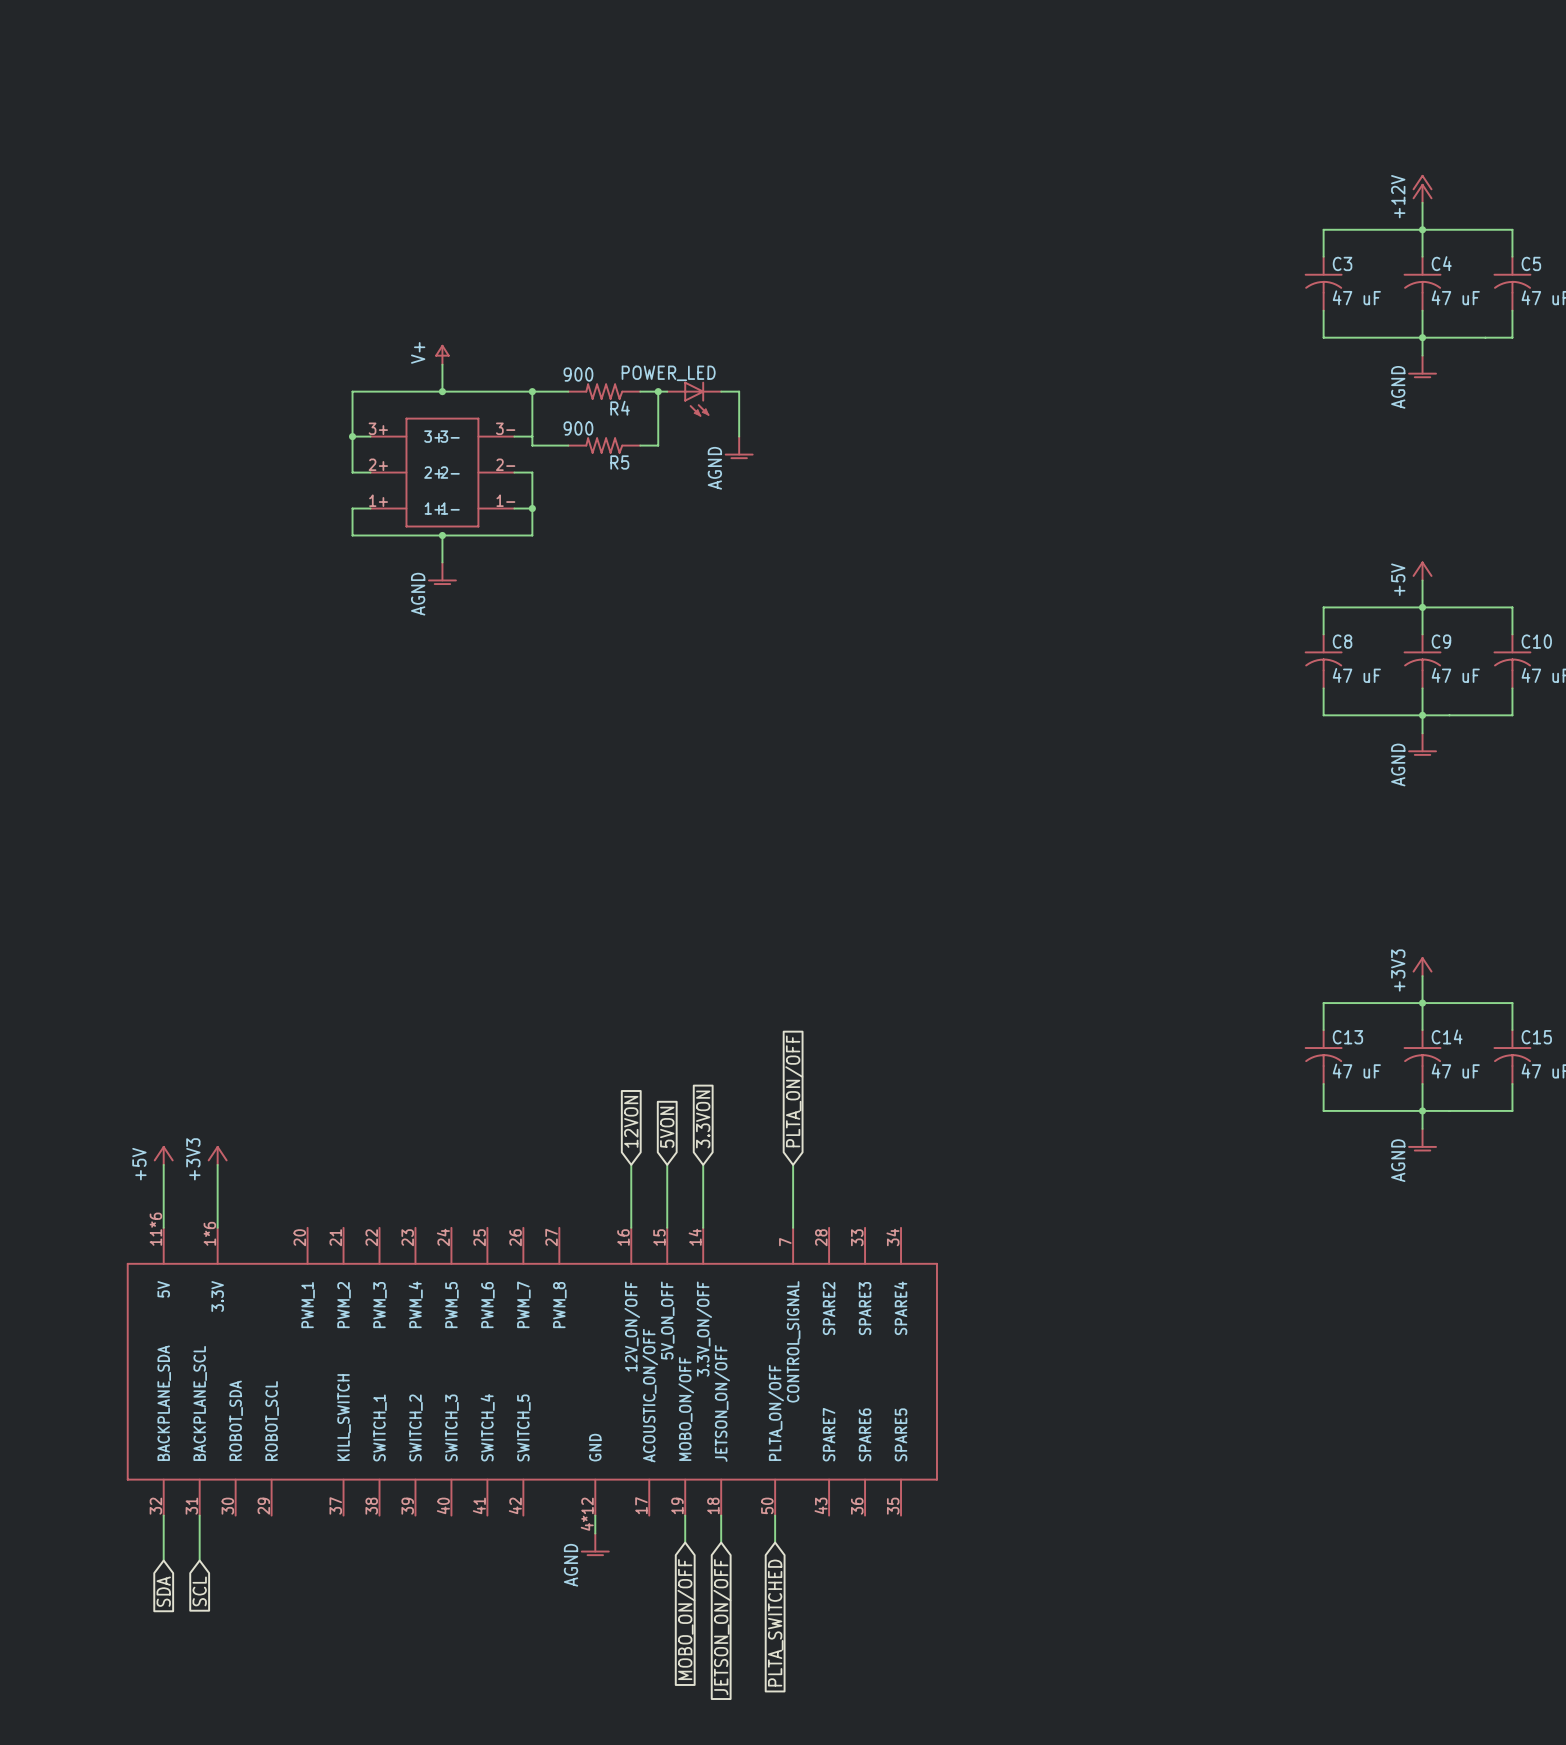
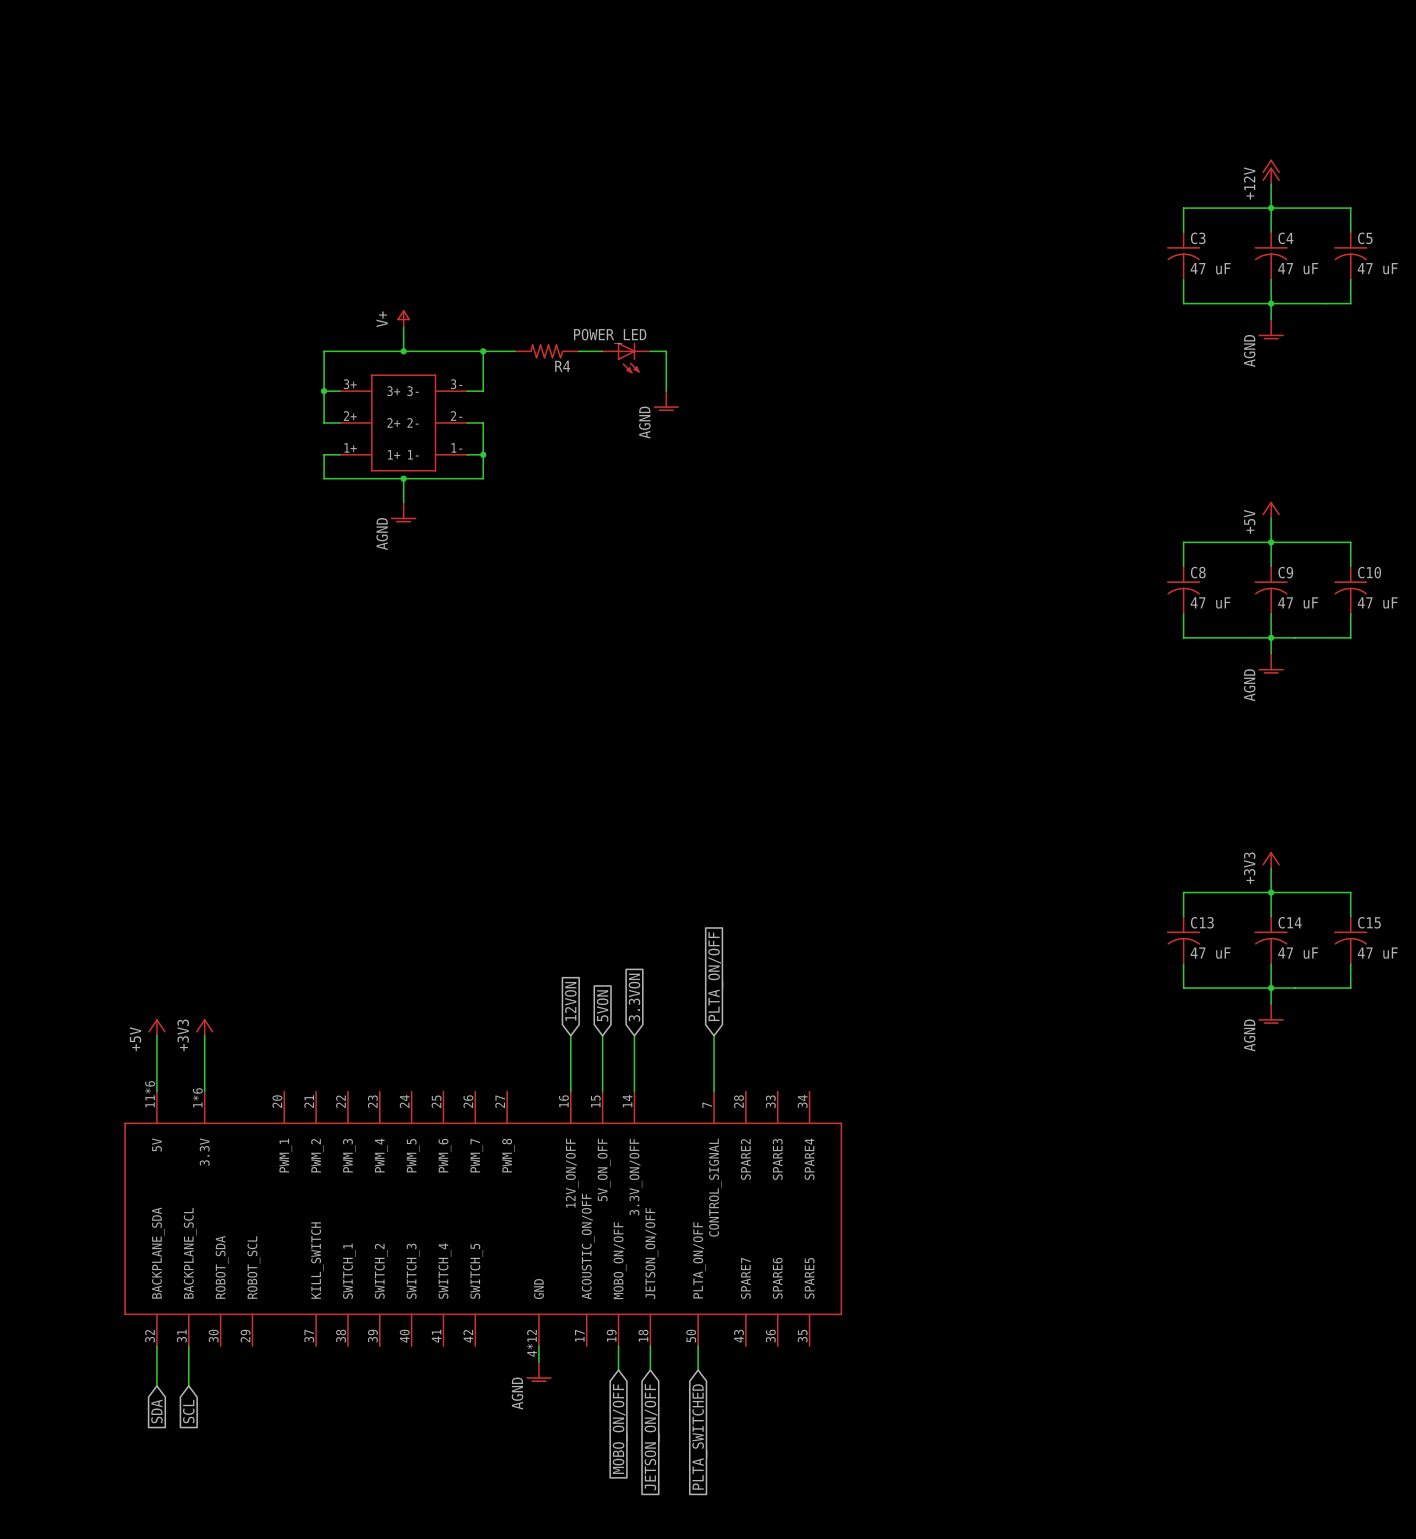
R4 value: 900 (578, 374) -> none
wire: (658, 391) (658, 445) (640, 445) -> none
junction: (658, 391) -> none
wire: (532, 436) (532, 445) (568, 445) -> none
R5: 900 (604, 445) -> none

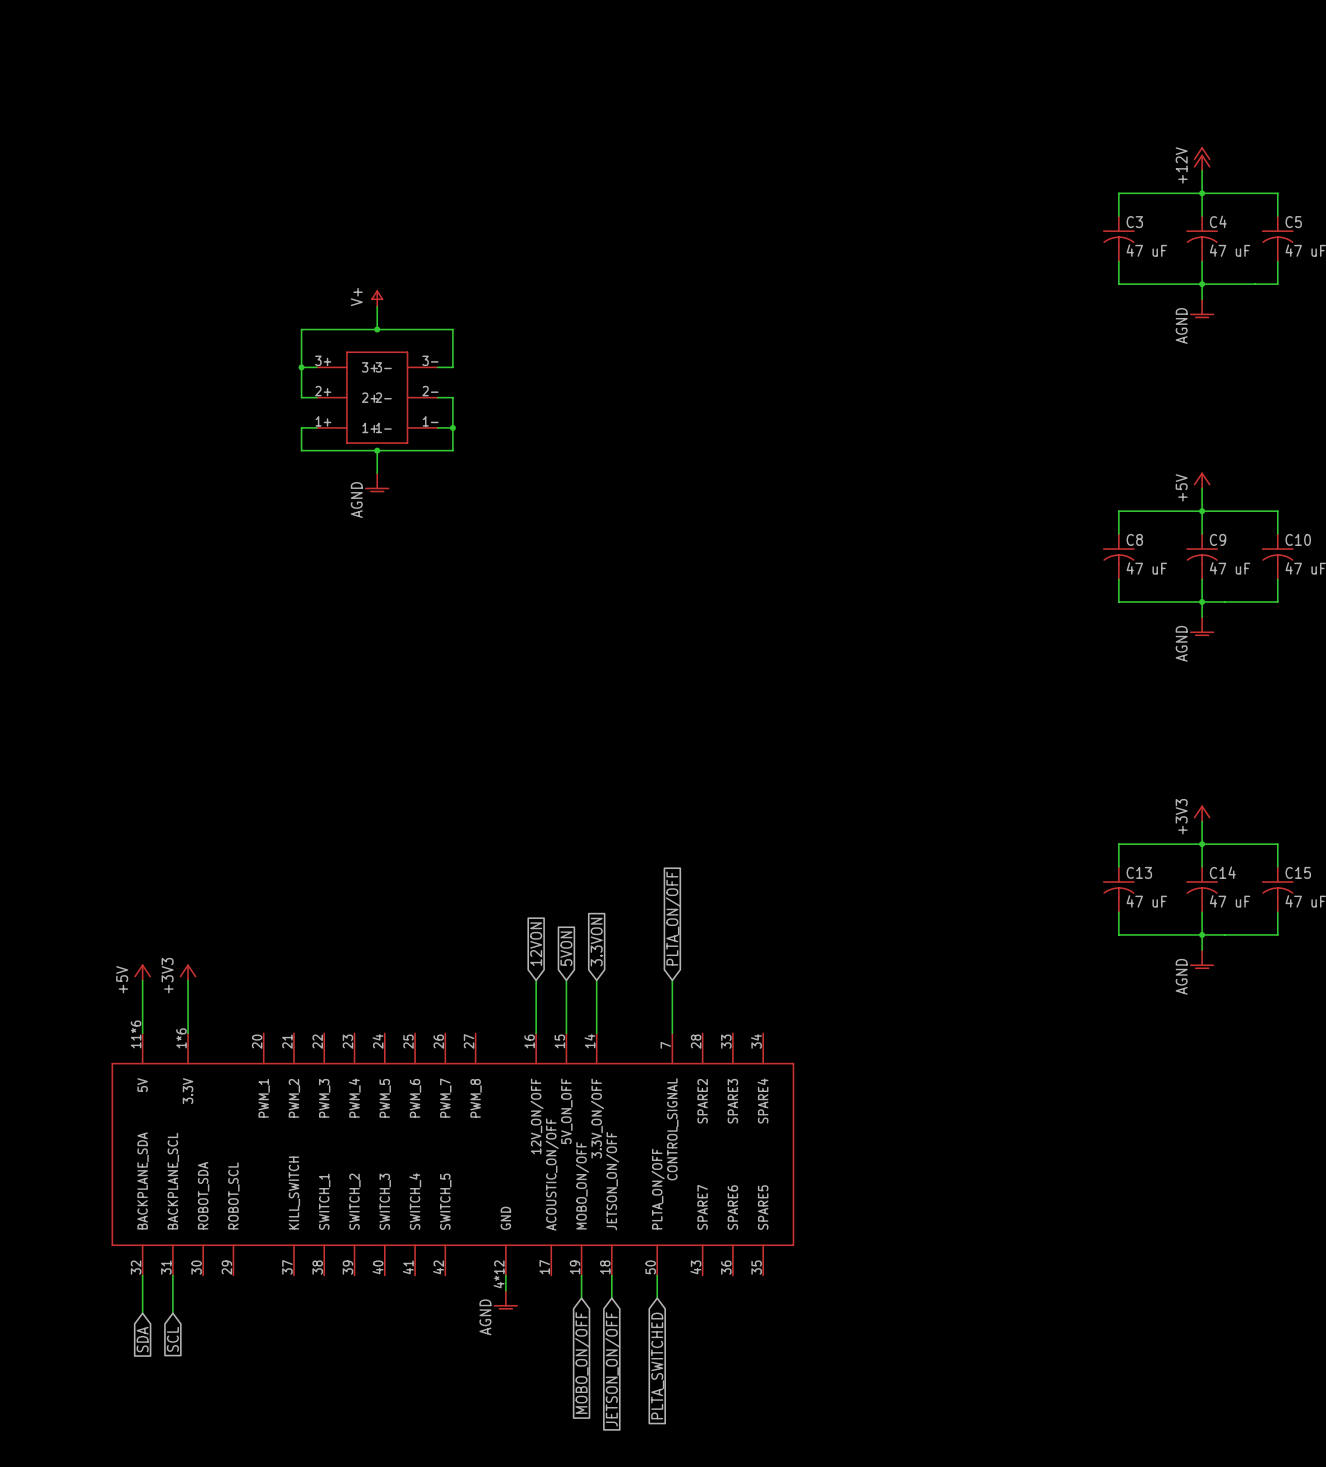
wire: (483, 351) (515, 351) -> none
junction: (483, 351) -> none
R4: (546, 351) -> none
wire: (578, 351) (602, 351) -> none
wire: (650, 351) (666, 351) (666, 391) -> none
POWER_LED: (626, 357) -> none
power symbol: AGND (666, 401) -> none

